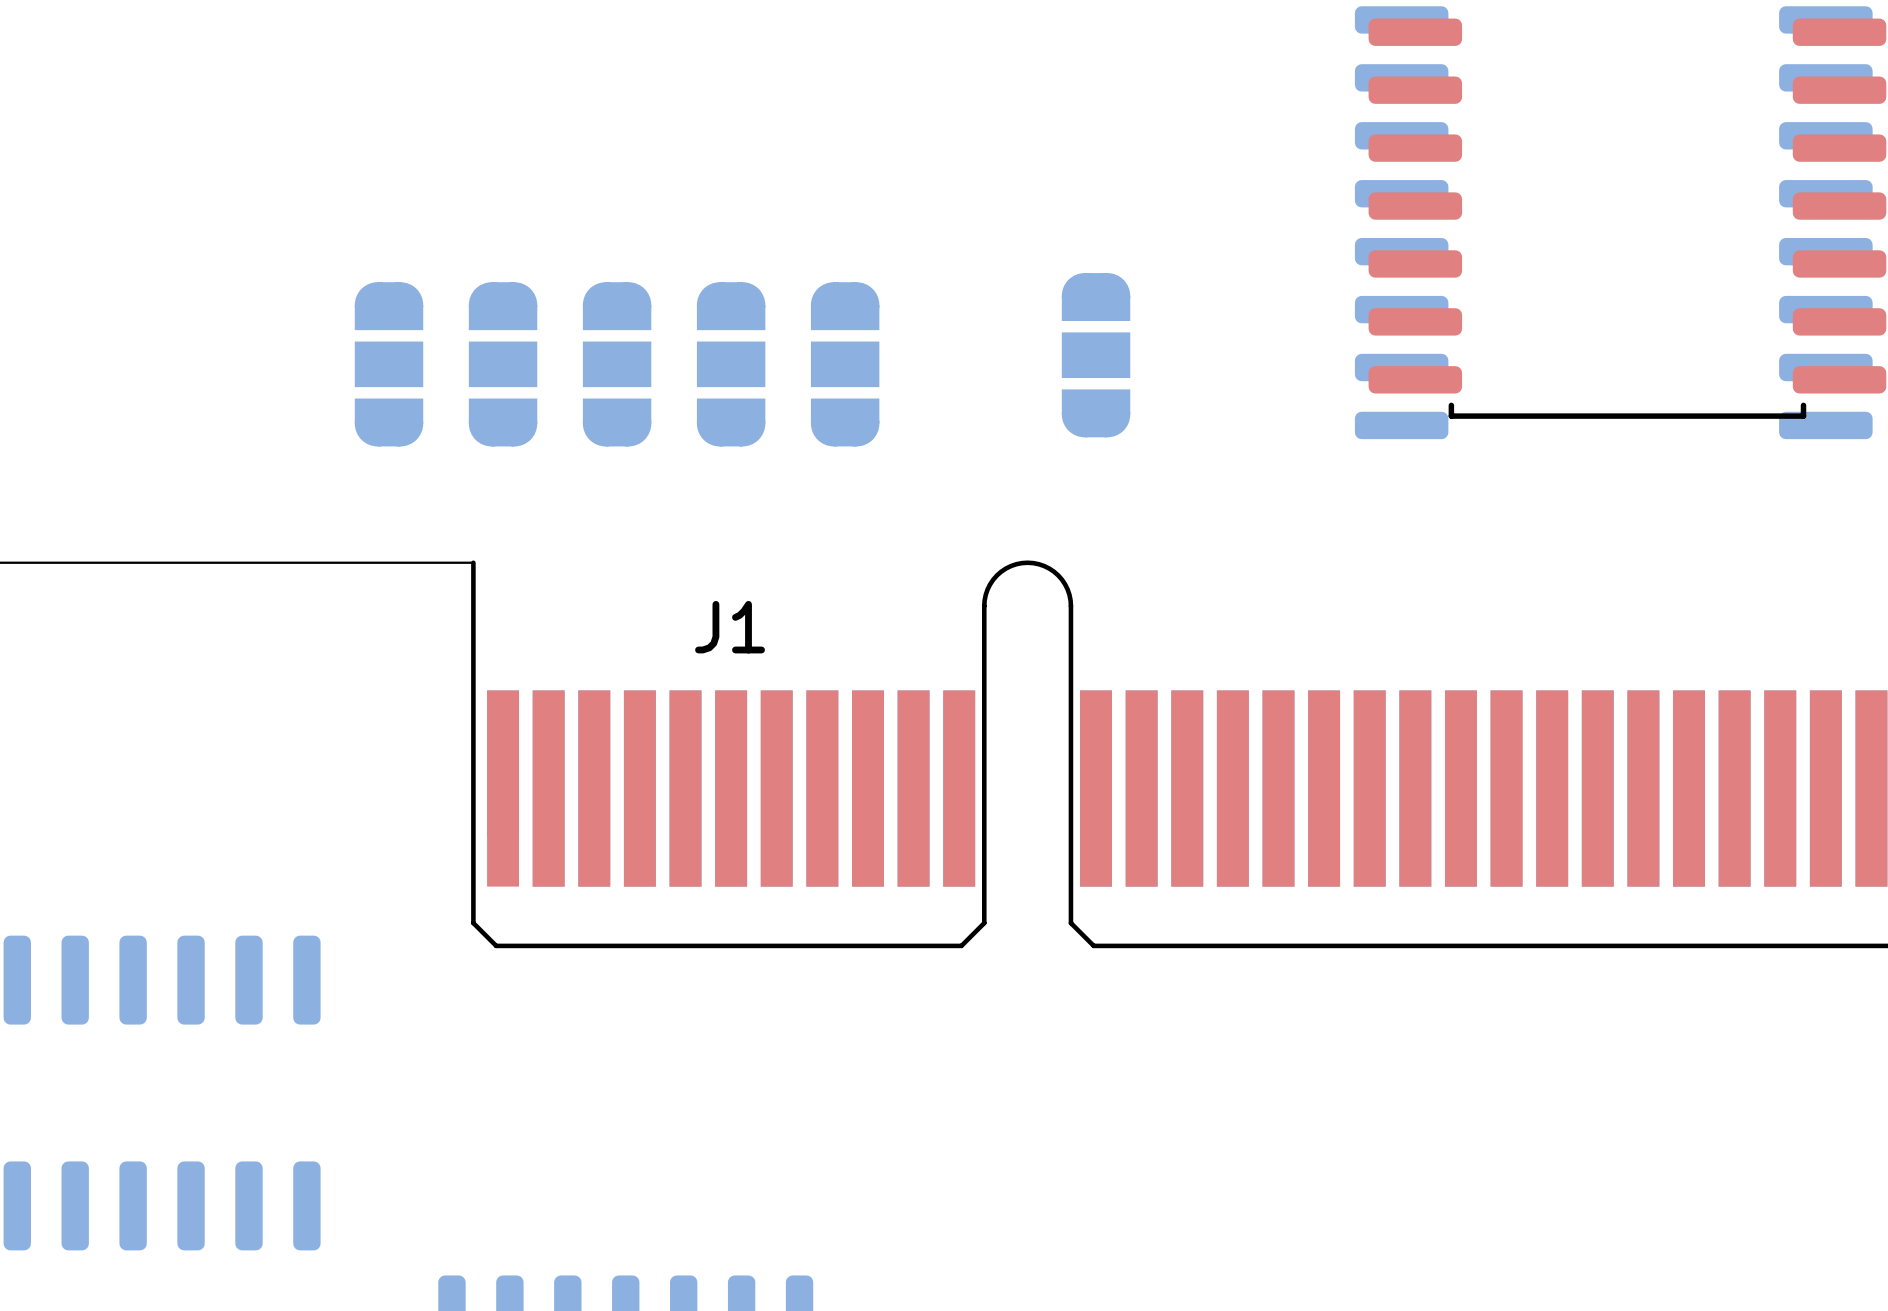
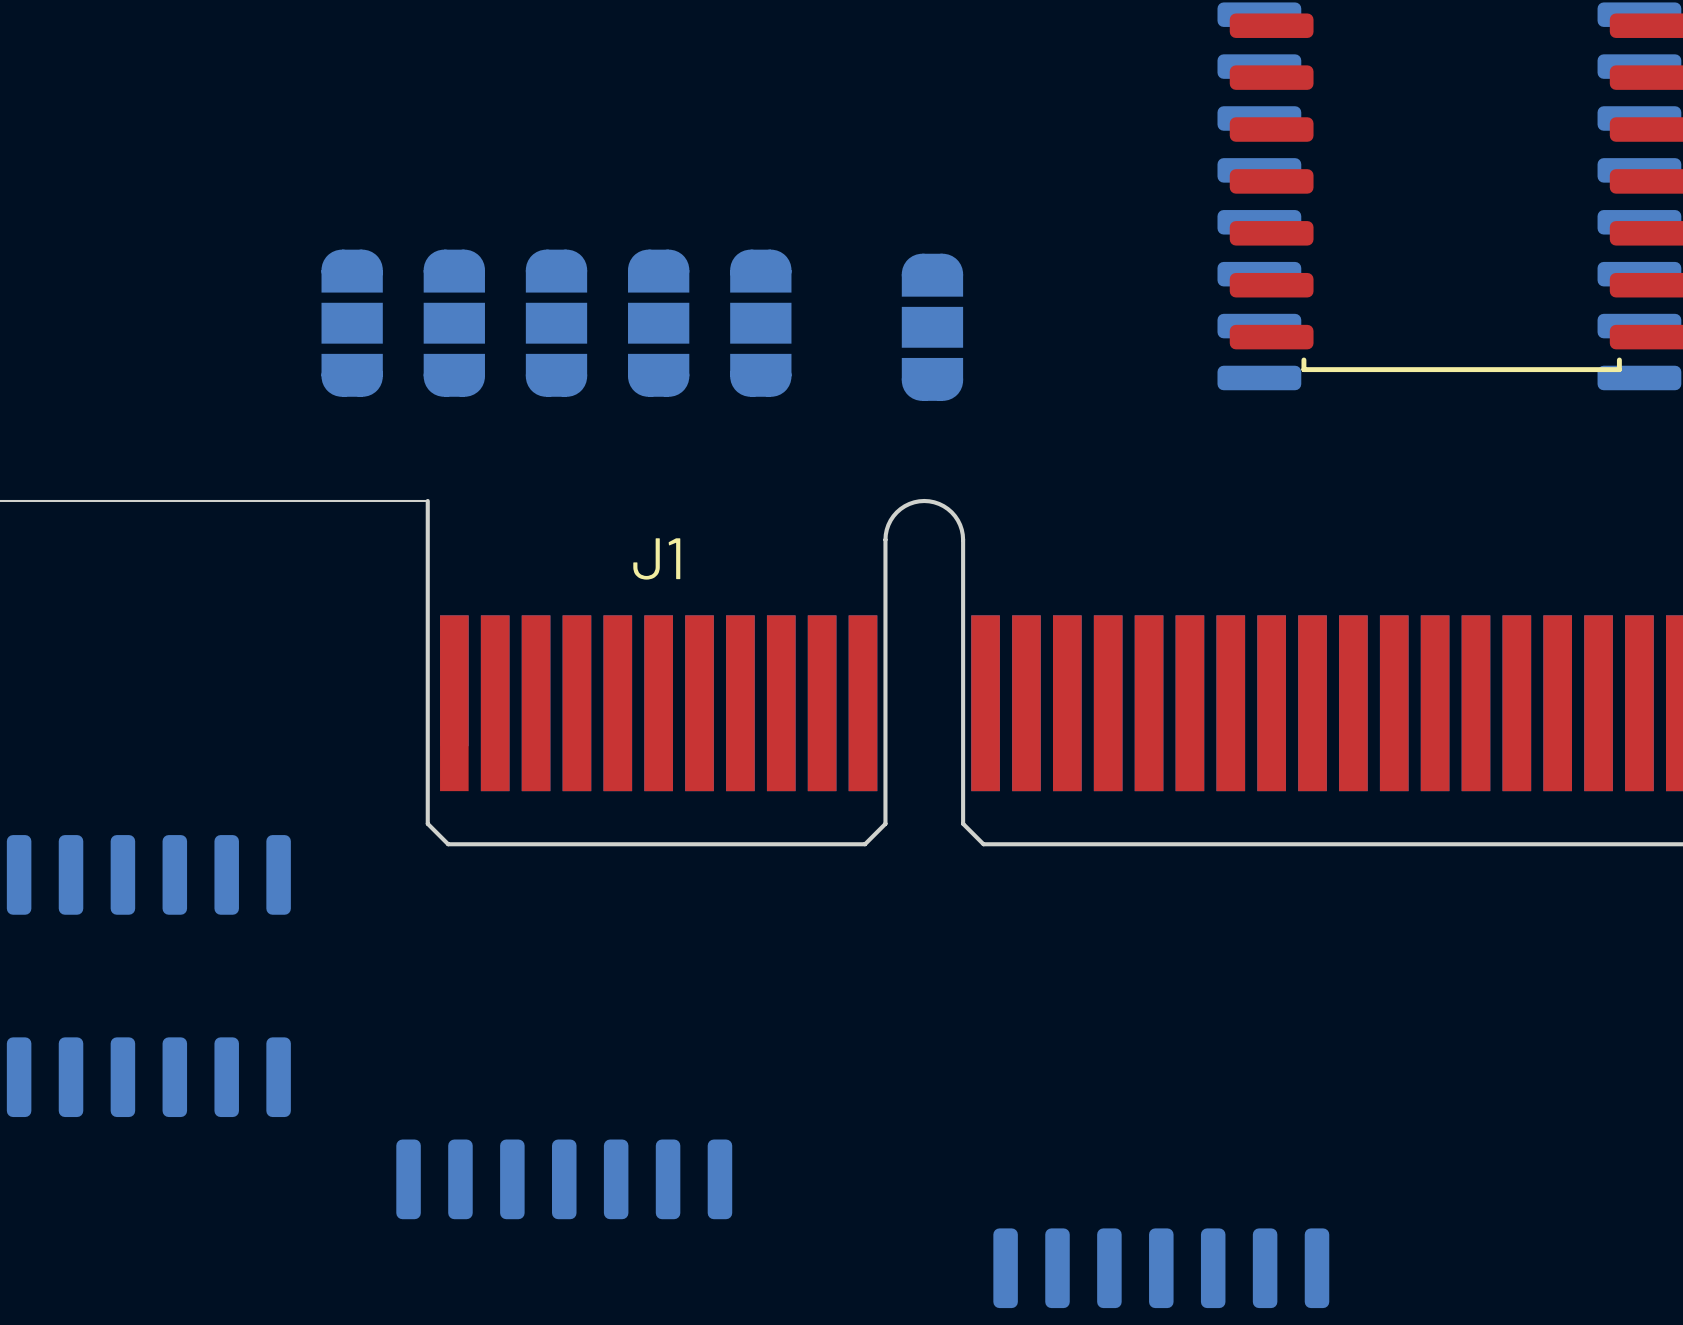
part position: (1096, 355) -> (932, 327)

